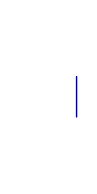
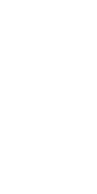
line: (76, 76) (76, 116) -> none

